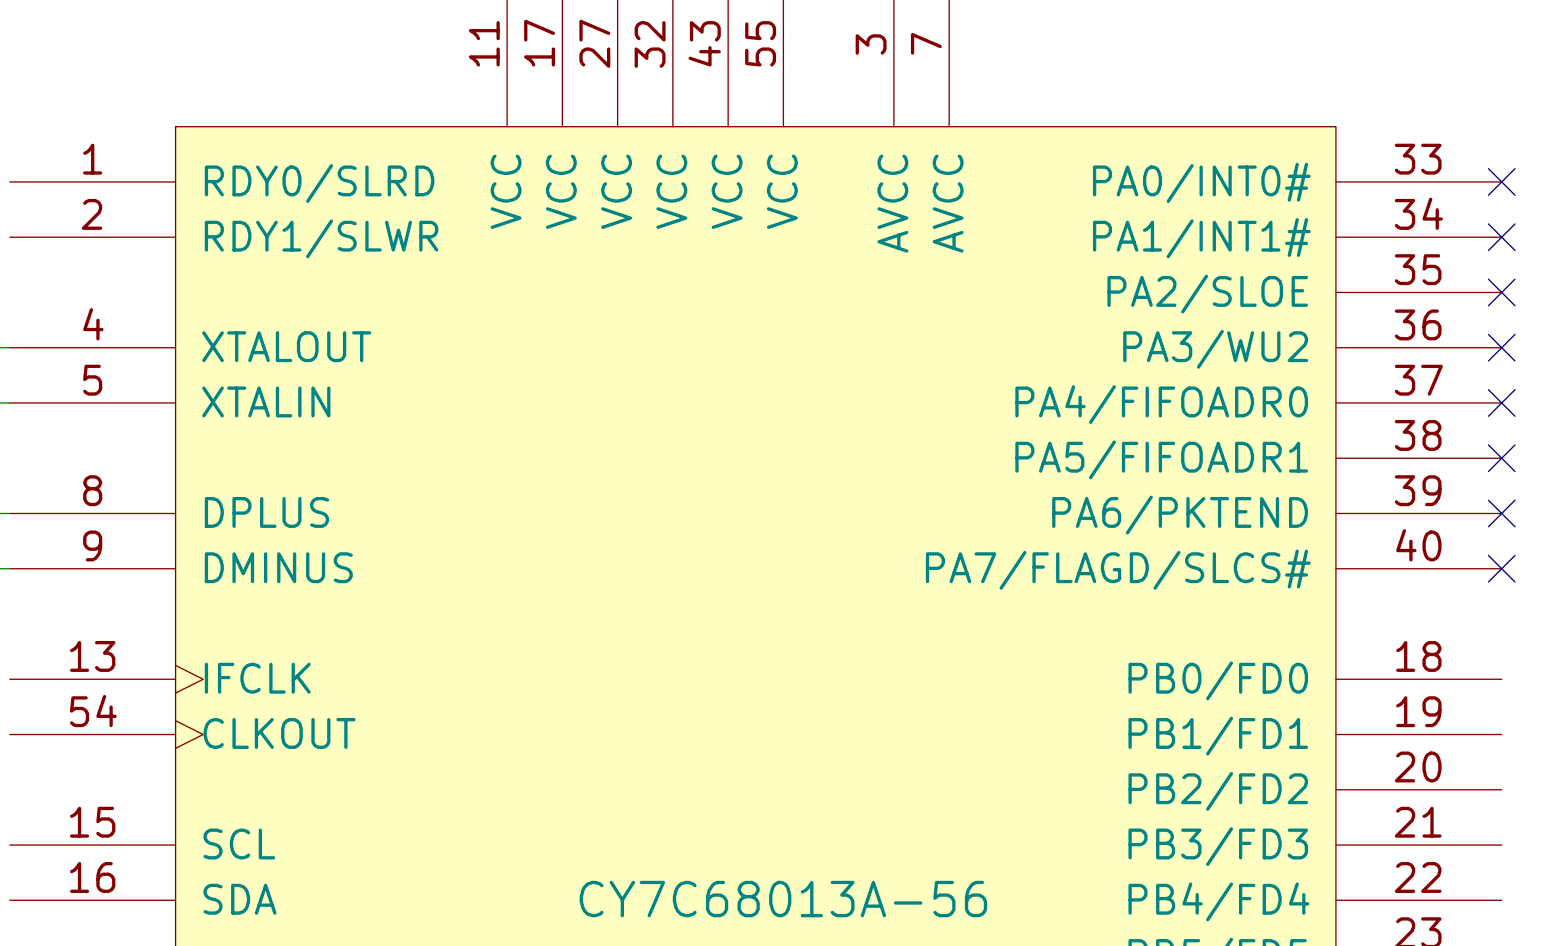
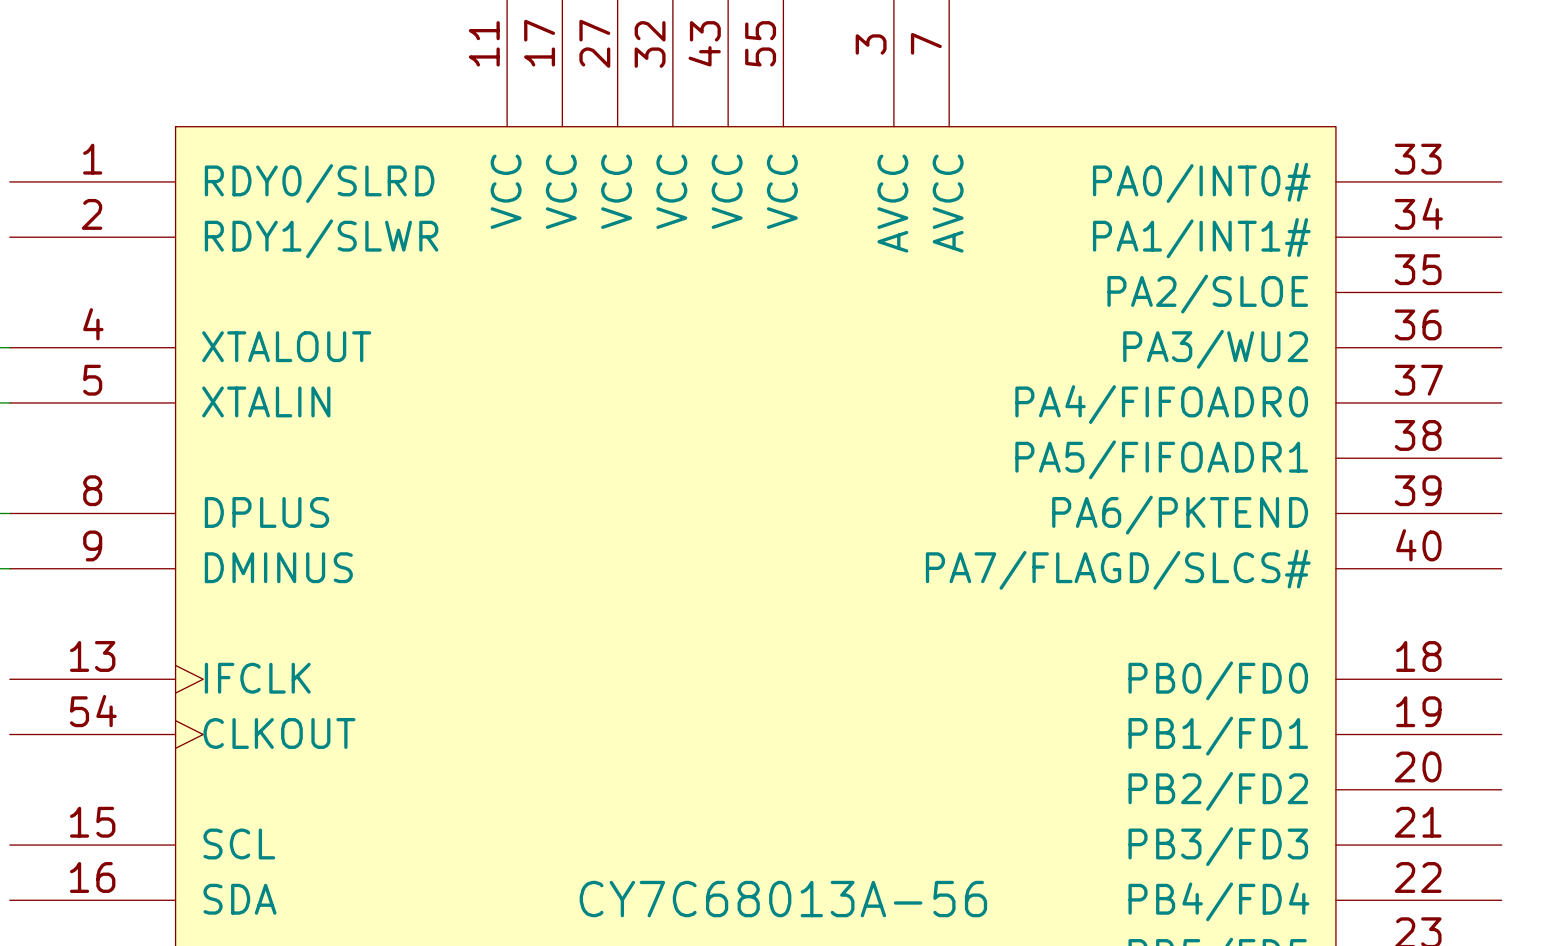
no-connect mark: (1501, 181) -> none
no-connect mark: (1501, 237) -> none
no-connect mark: (1501, 292) -> none
no-connect mark: (1501, 347) -> none
no-connect mark: (1501, 402) -> none
no-connect mark: (1501, 458) -> none
no-connect mark: (1501, 513) -> none
no-connect mark: (1501, 568) -> none

